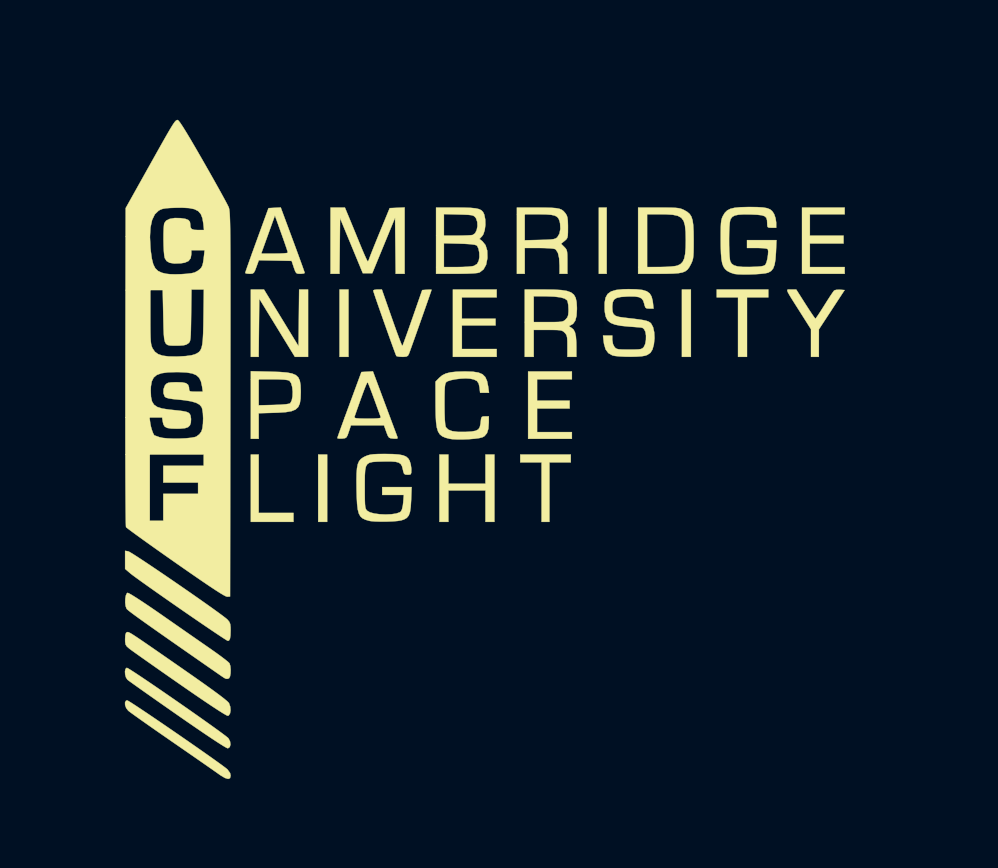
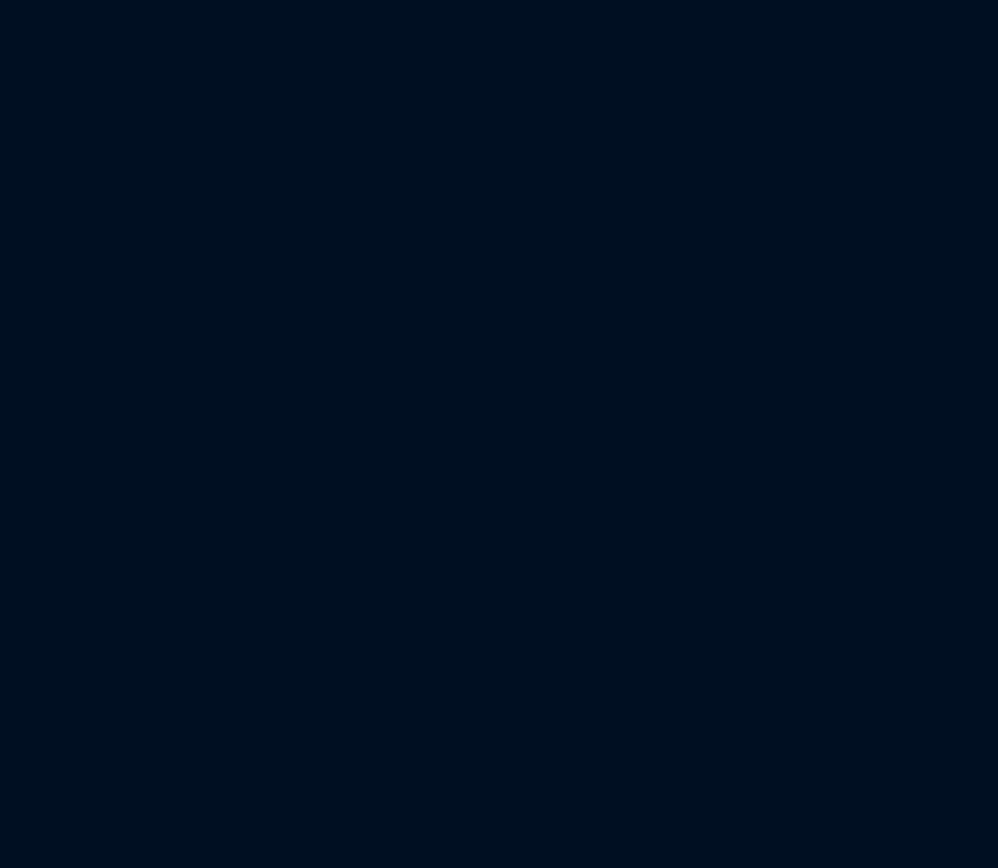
drawing: [124, 119, 845, 780] -> none

